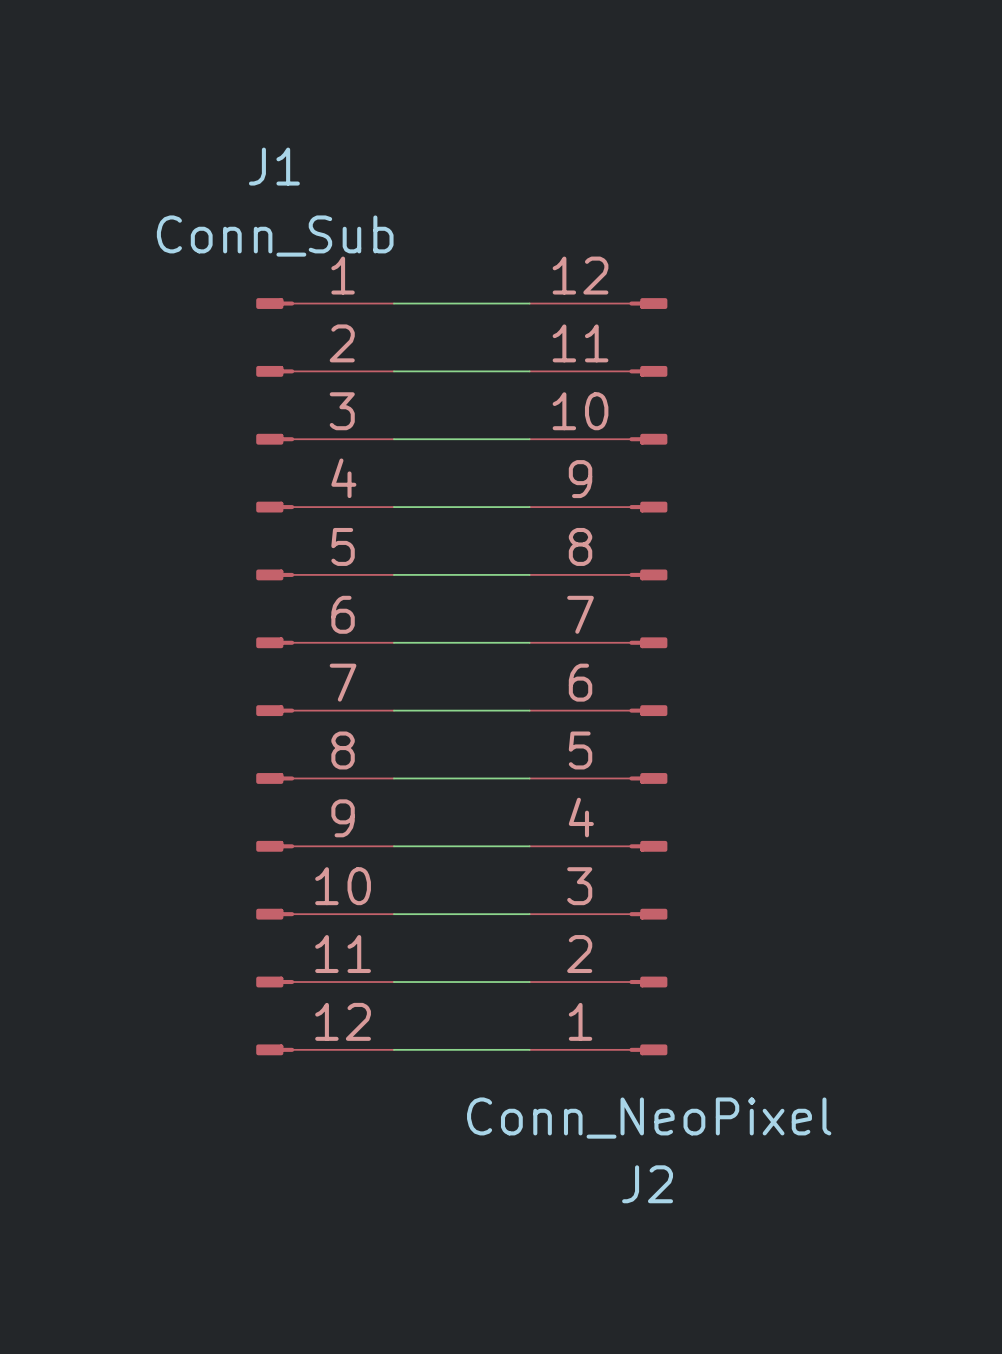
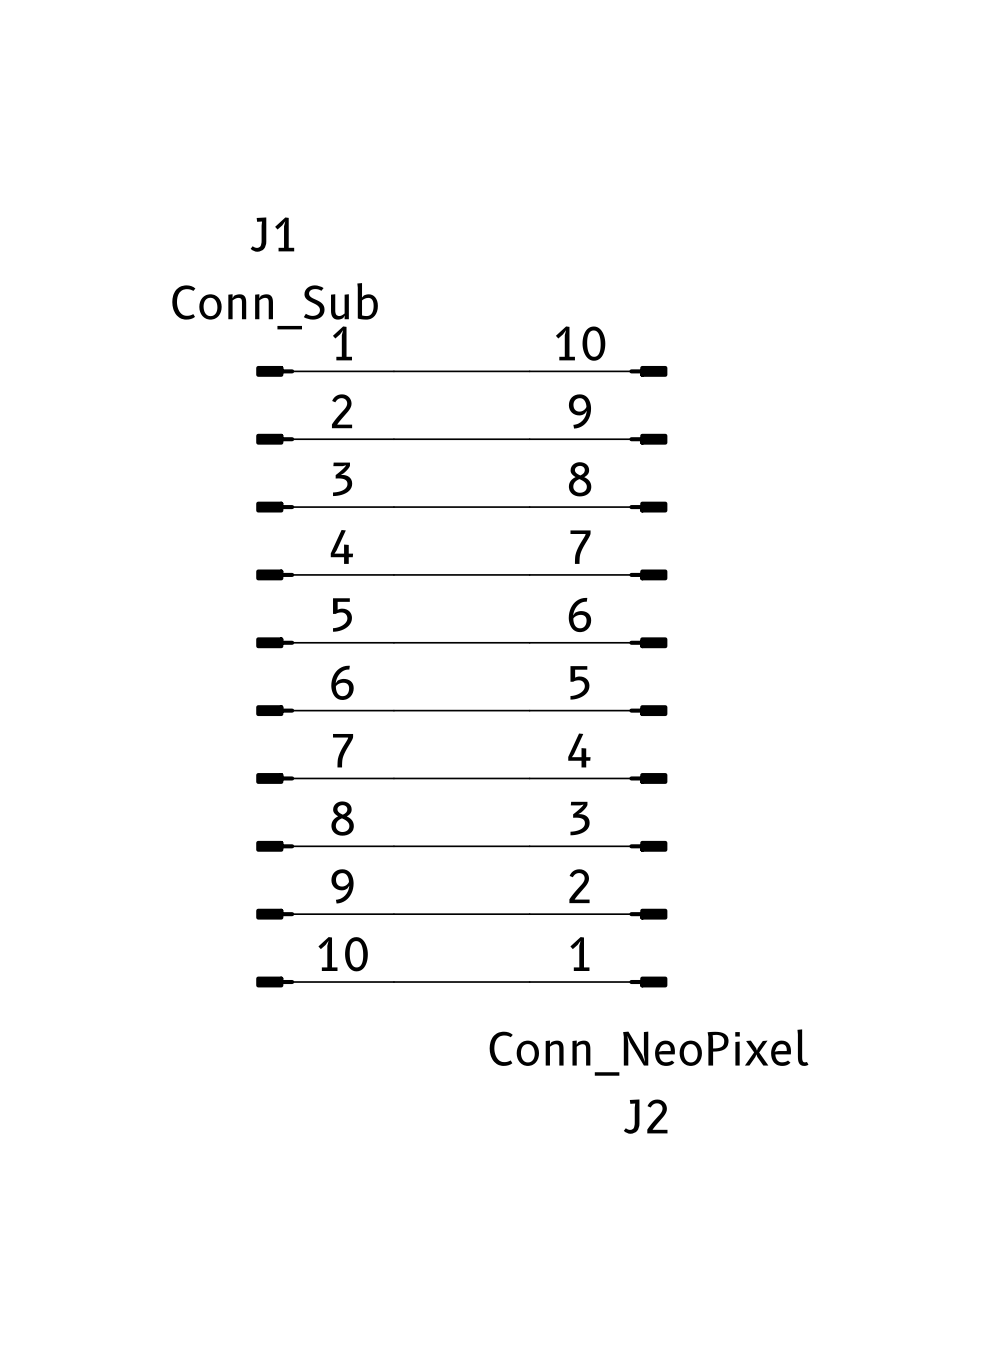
J1 name position: J1 (274, 166) -> J1 (272, 234)
J1 value position: Conn_Sub (275, 236) -> Conn_Sub (275, 306)
J1 symbol: [256, 298, 394, 1056] -> [256, 365, 394, 988]
J2 symbol: [529, 298, 668, 1056] -> [529, 365, 668, 988]
wire: (393, 303) (529, 303) -> none
wire: (393, 1049) (529, 1049) -> none
J2 value position: Conn_NeoPixel (649, 1118) -> Conn_NeoPixel (649, 1052)
J2 name position: J2 (647, 1184) -> J2 (645, 1116)

